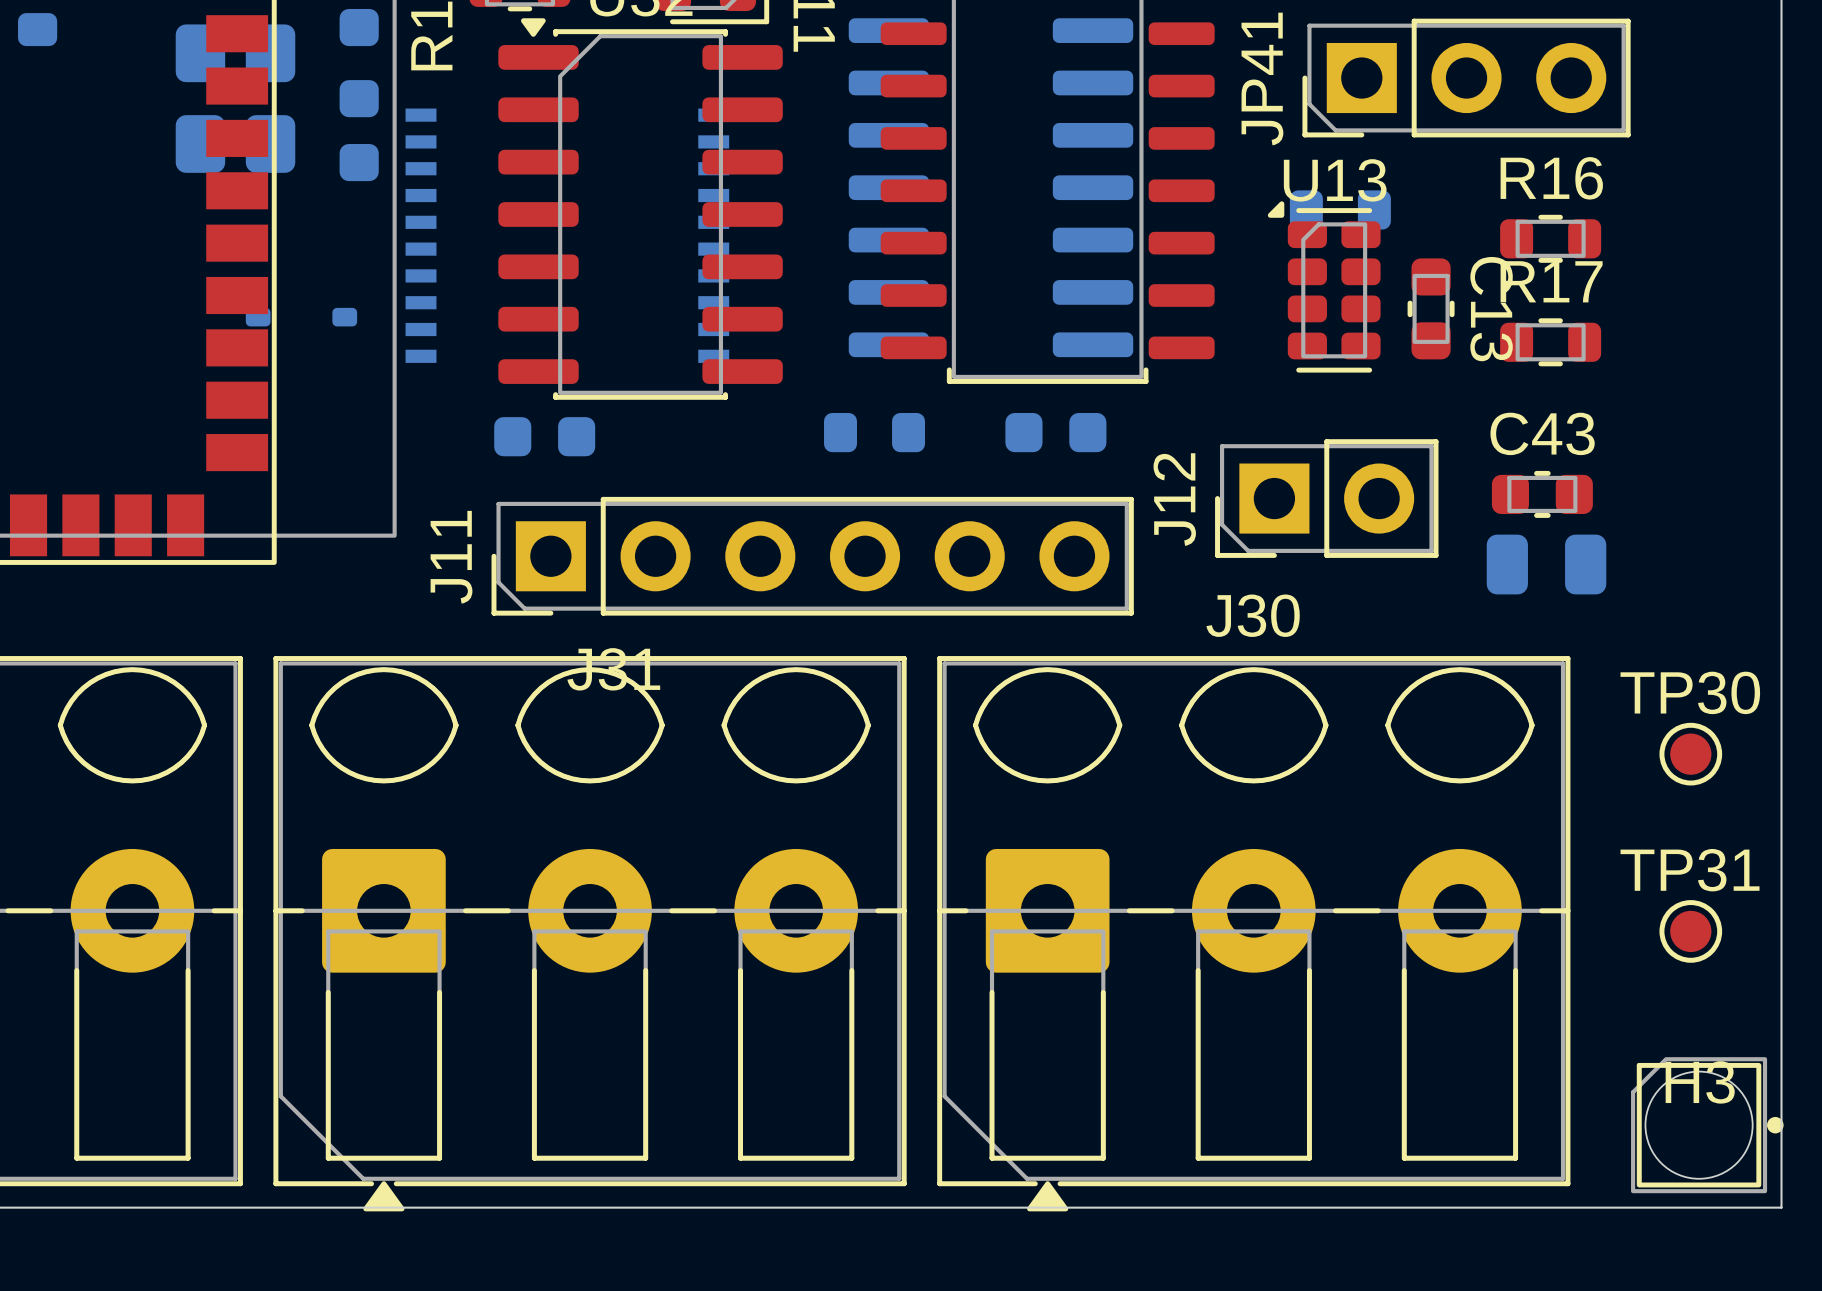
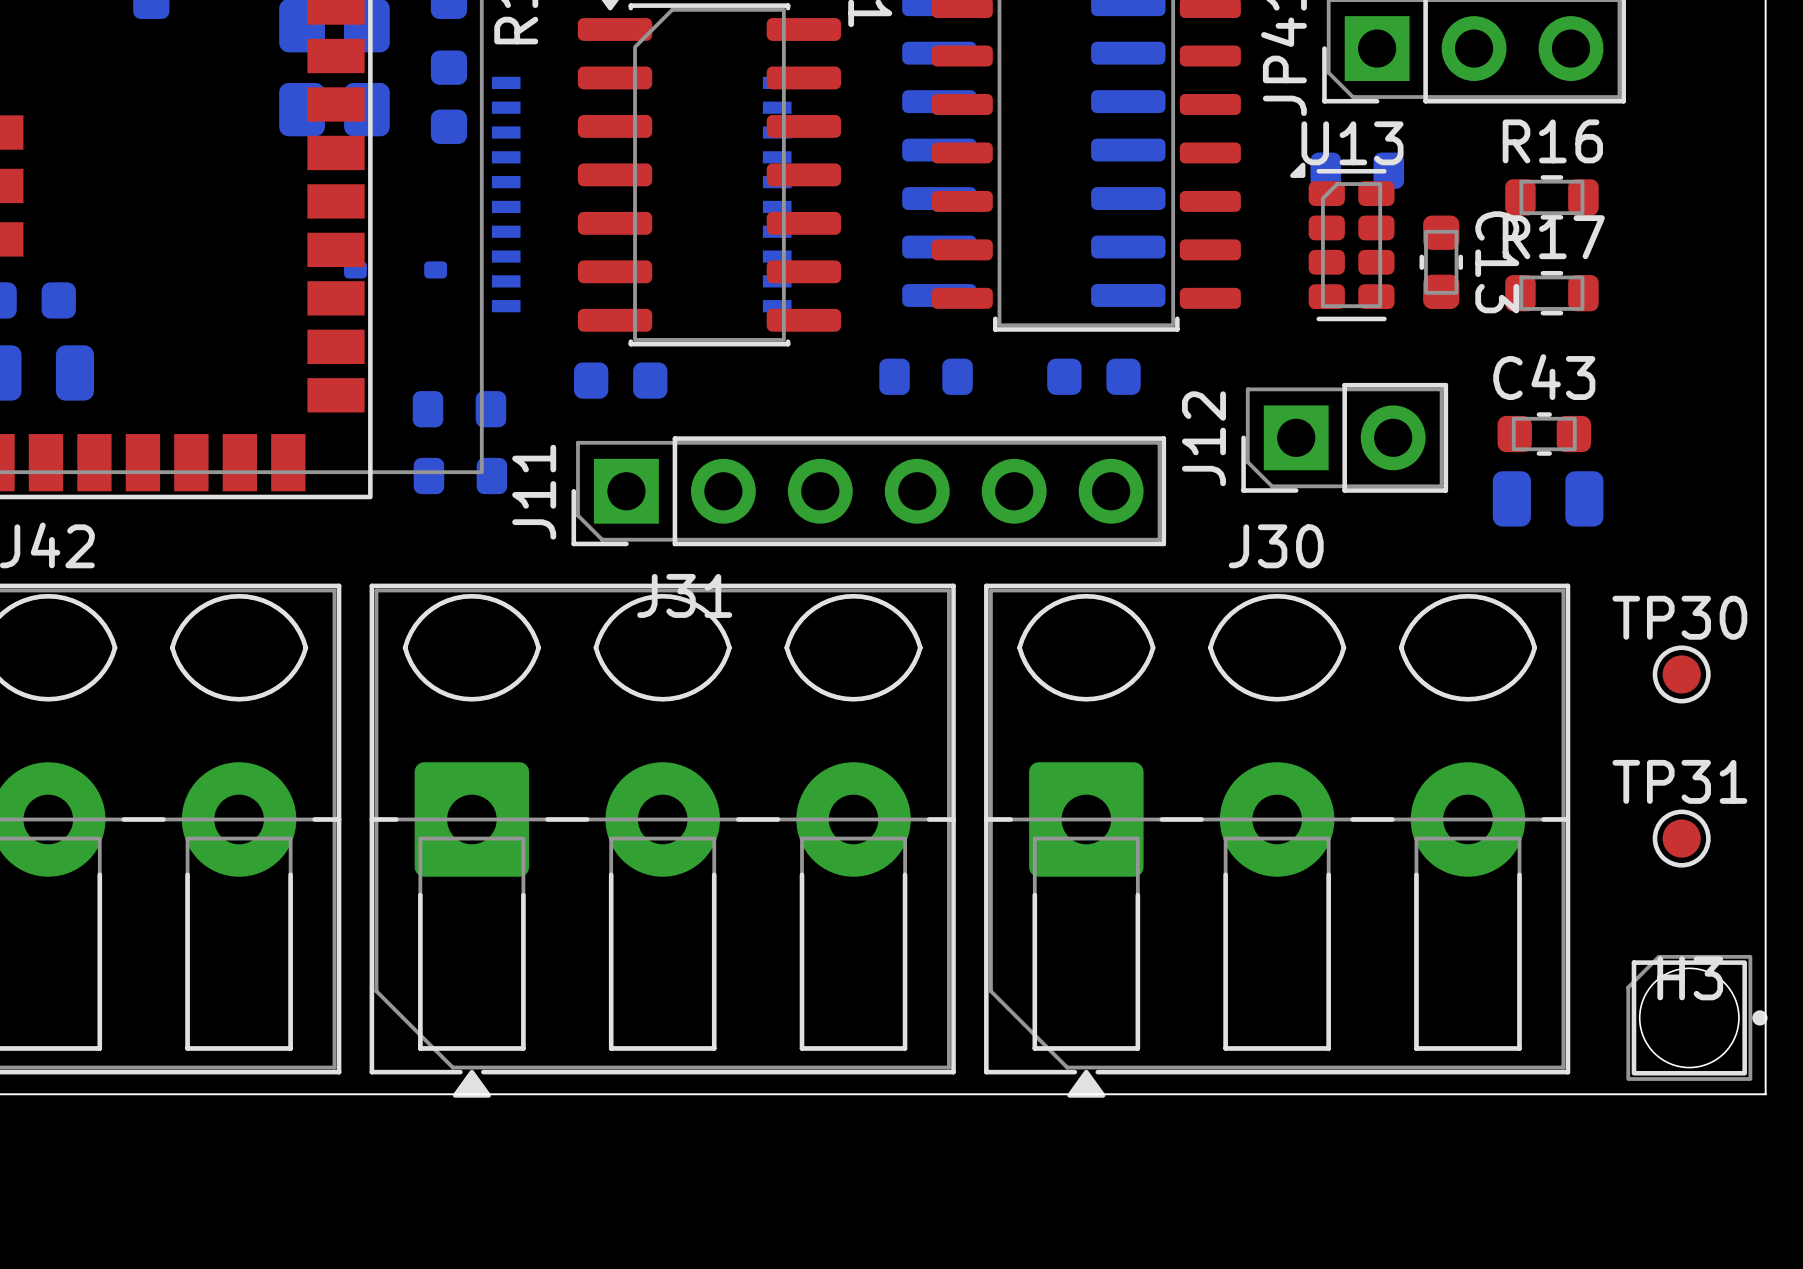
part: none -> (459, 409)
part: none -> (460, 476)

